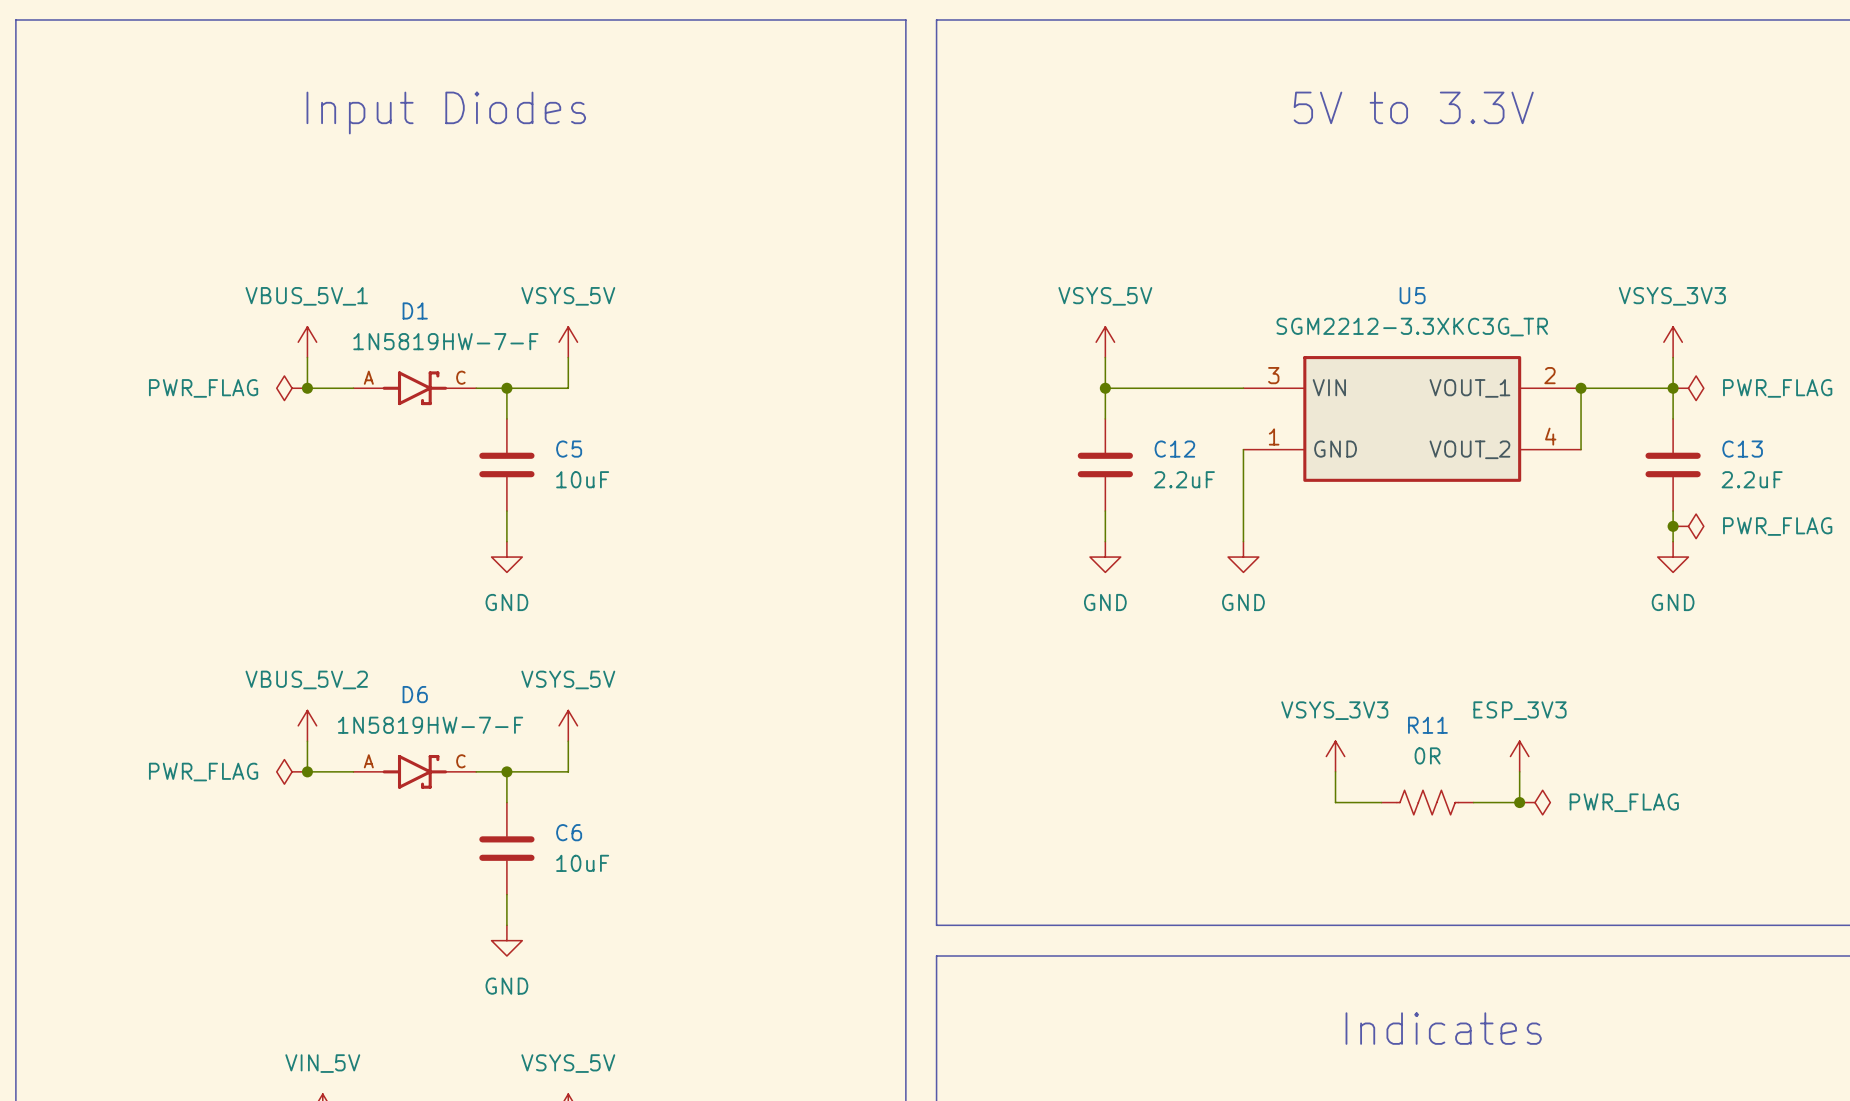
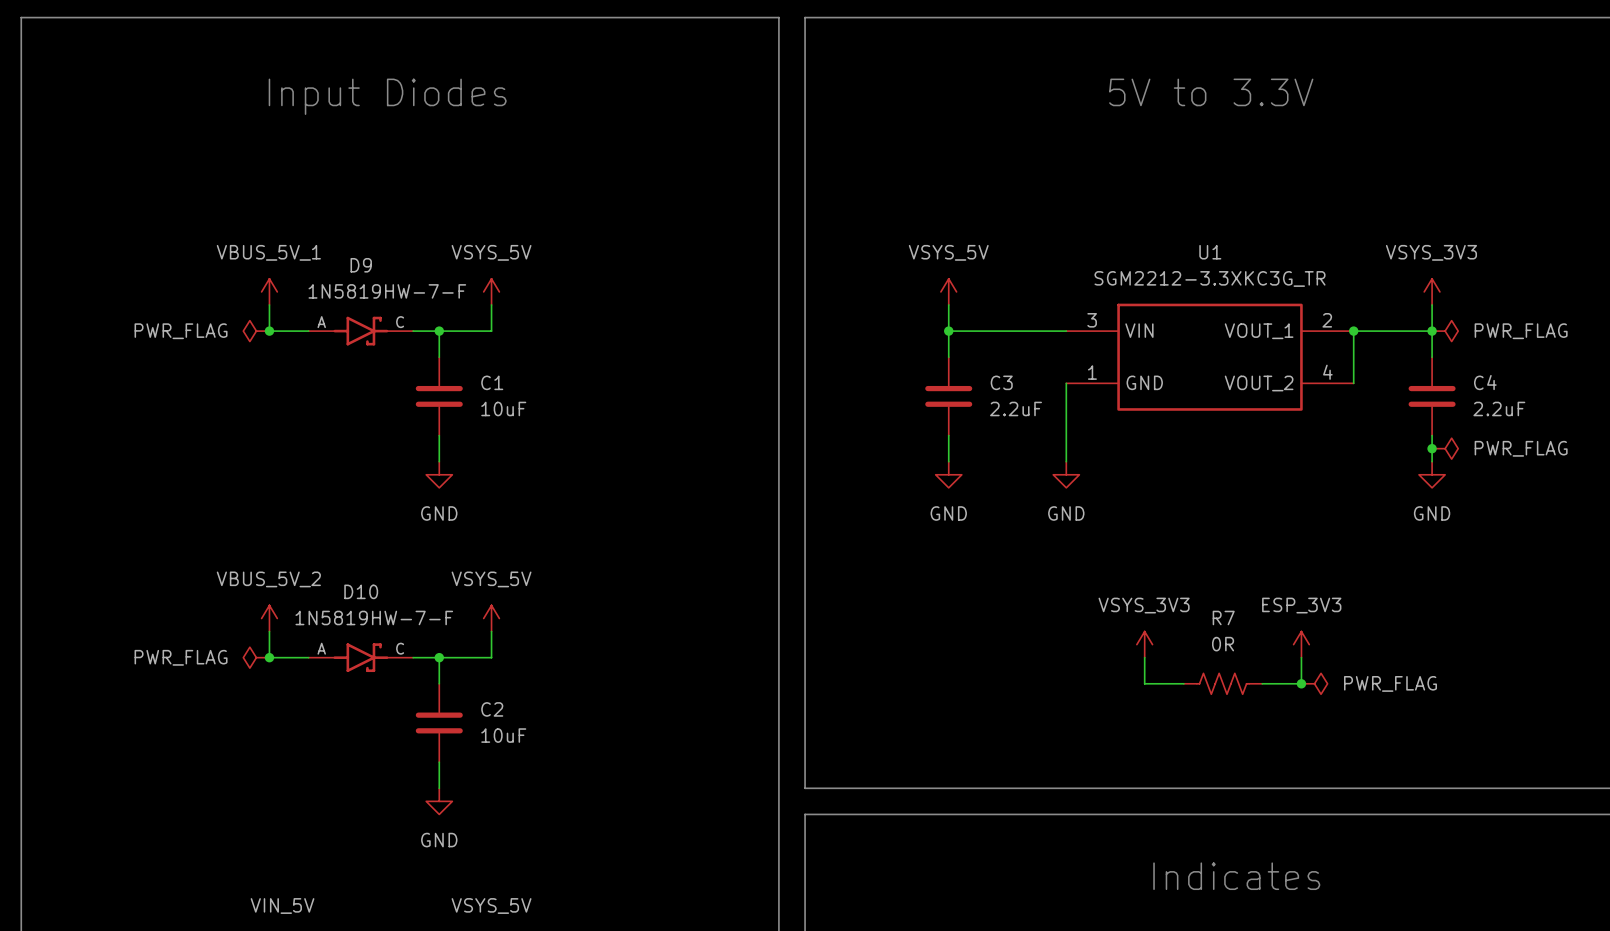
U5 name: U5 (1412, 295) -> U1 (1210, 252)
D1 name: D1 (415, 310) -> D9 (361, 265)
C5 name: C5 (569, 449) -> C1 (492, 382)
C12 name: C12 (1174, 449) -> C3 (1001, 382)
C13 name: C13 (1742, 449) -> C4 (1485, 382)
D6 name: D6 (415, 694) -> D10 (361, 591)
R11 name: R11 (1427, 725) -> R7 (1223, 617)
C6 name: C6 (569, 832) -> C2 (492, 709)

